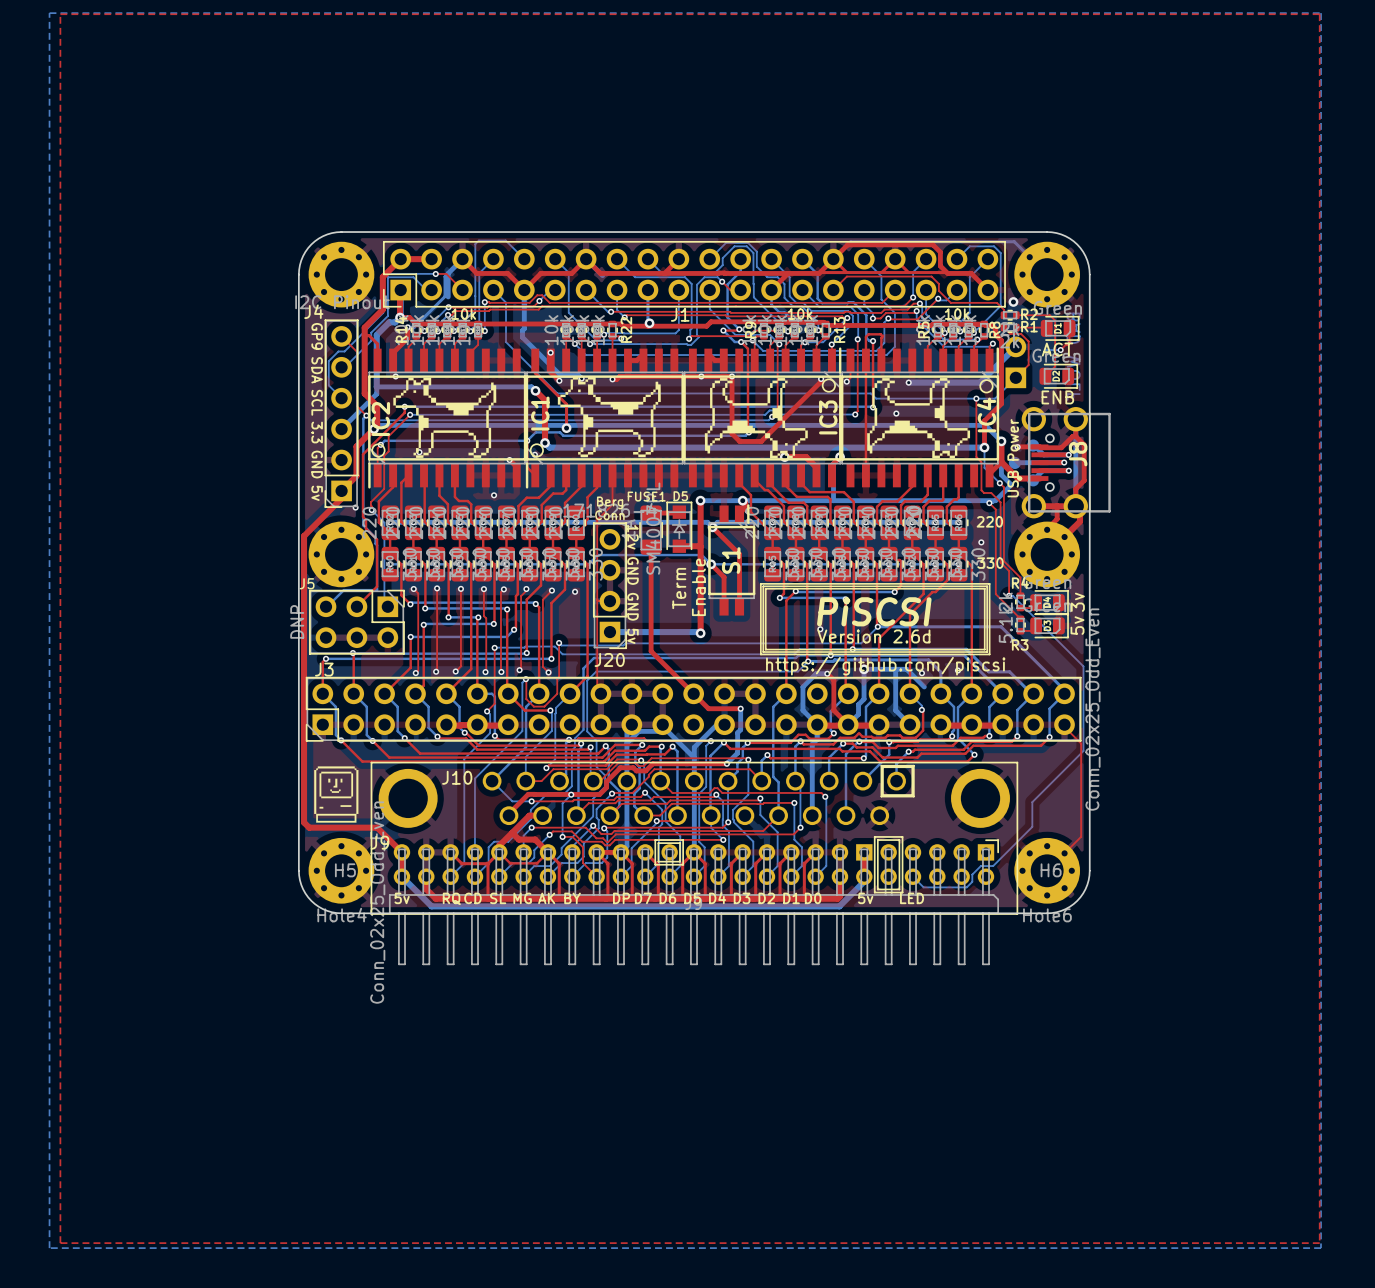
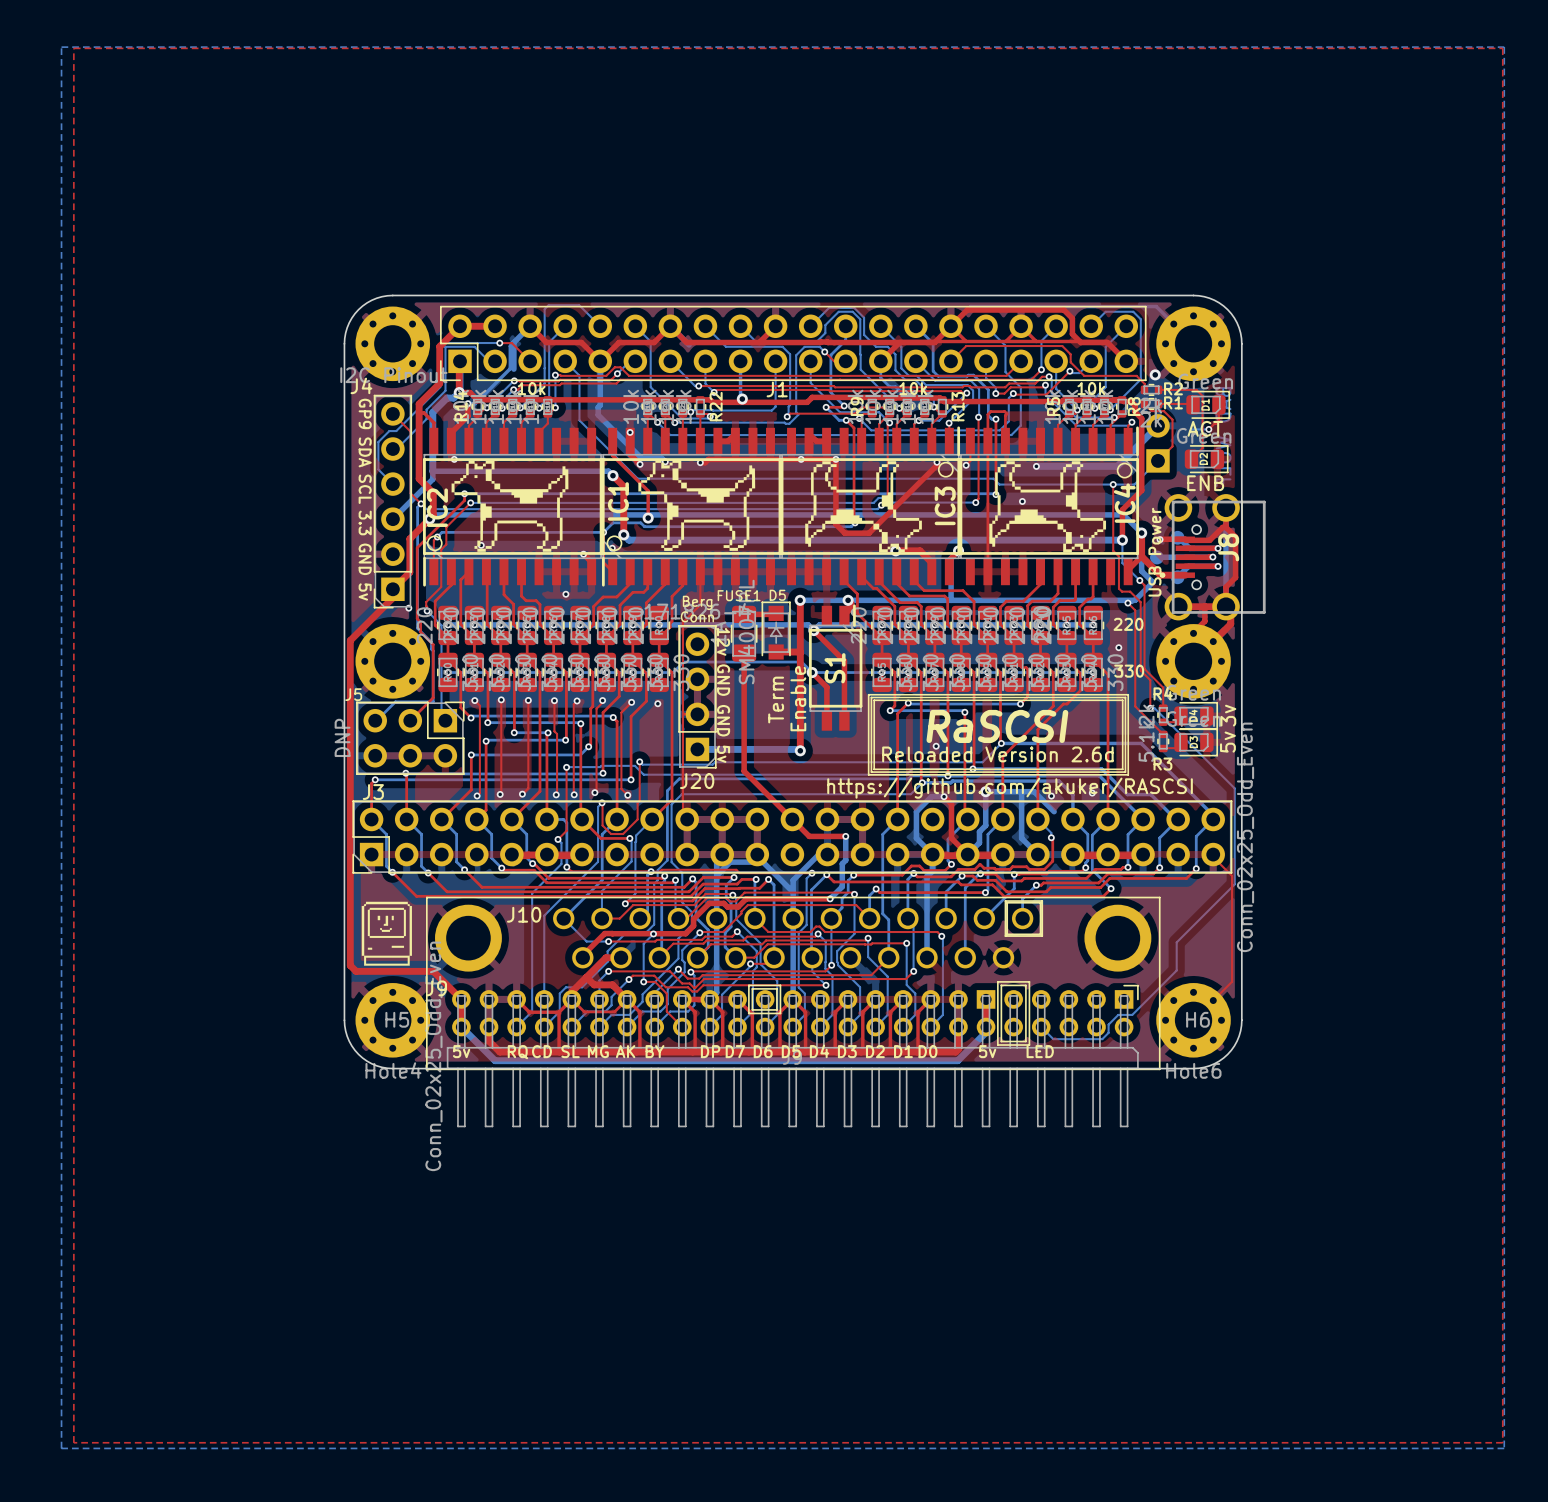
text: PiSCSI (874, 611) -> RaSCSI (997, 726)
text: Version 2.6d (873, 636) -> Reloaded Version 2.6d (997, 754)
text: https://github.com/piscsi (885, 666) -> https://github.com/akuker/RASCSI (1010, 788)

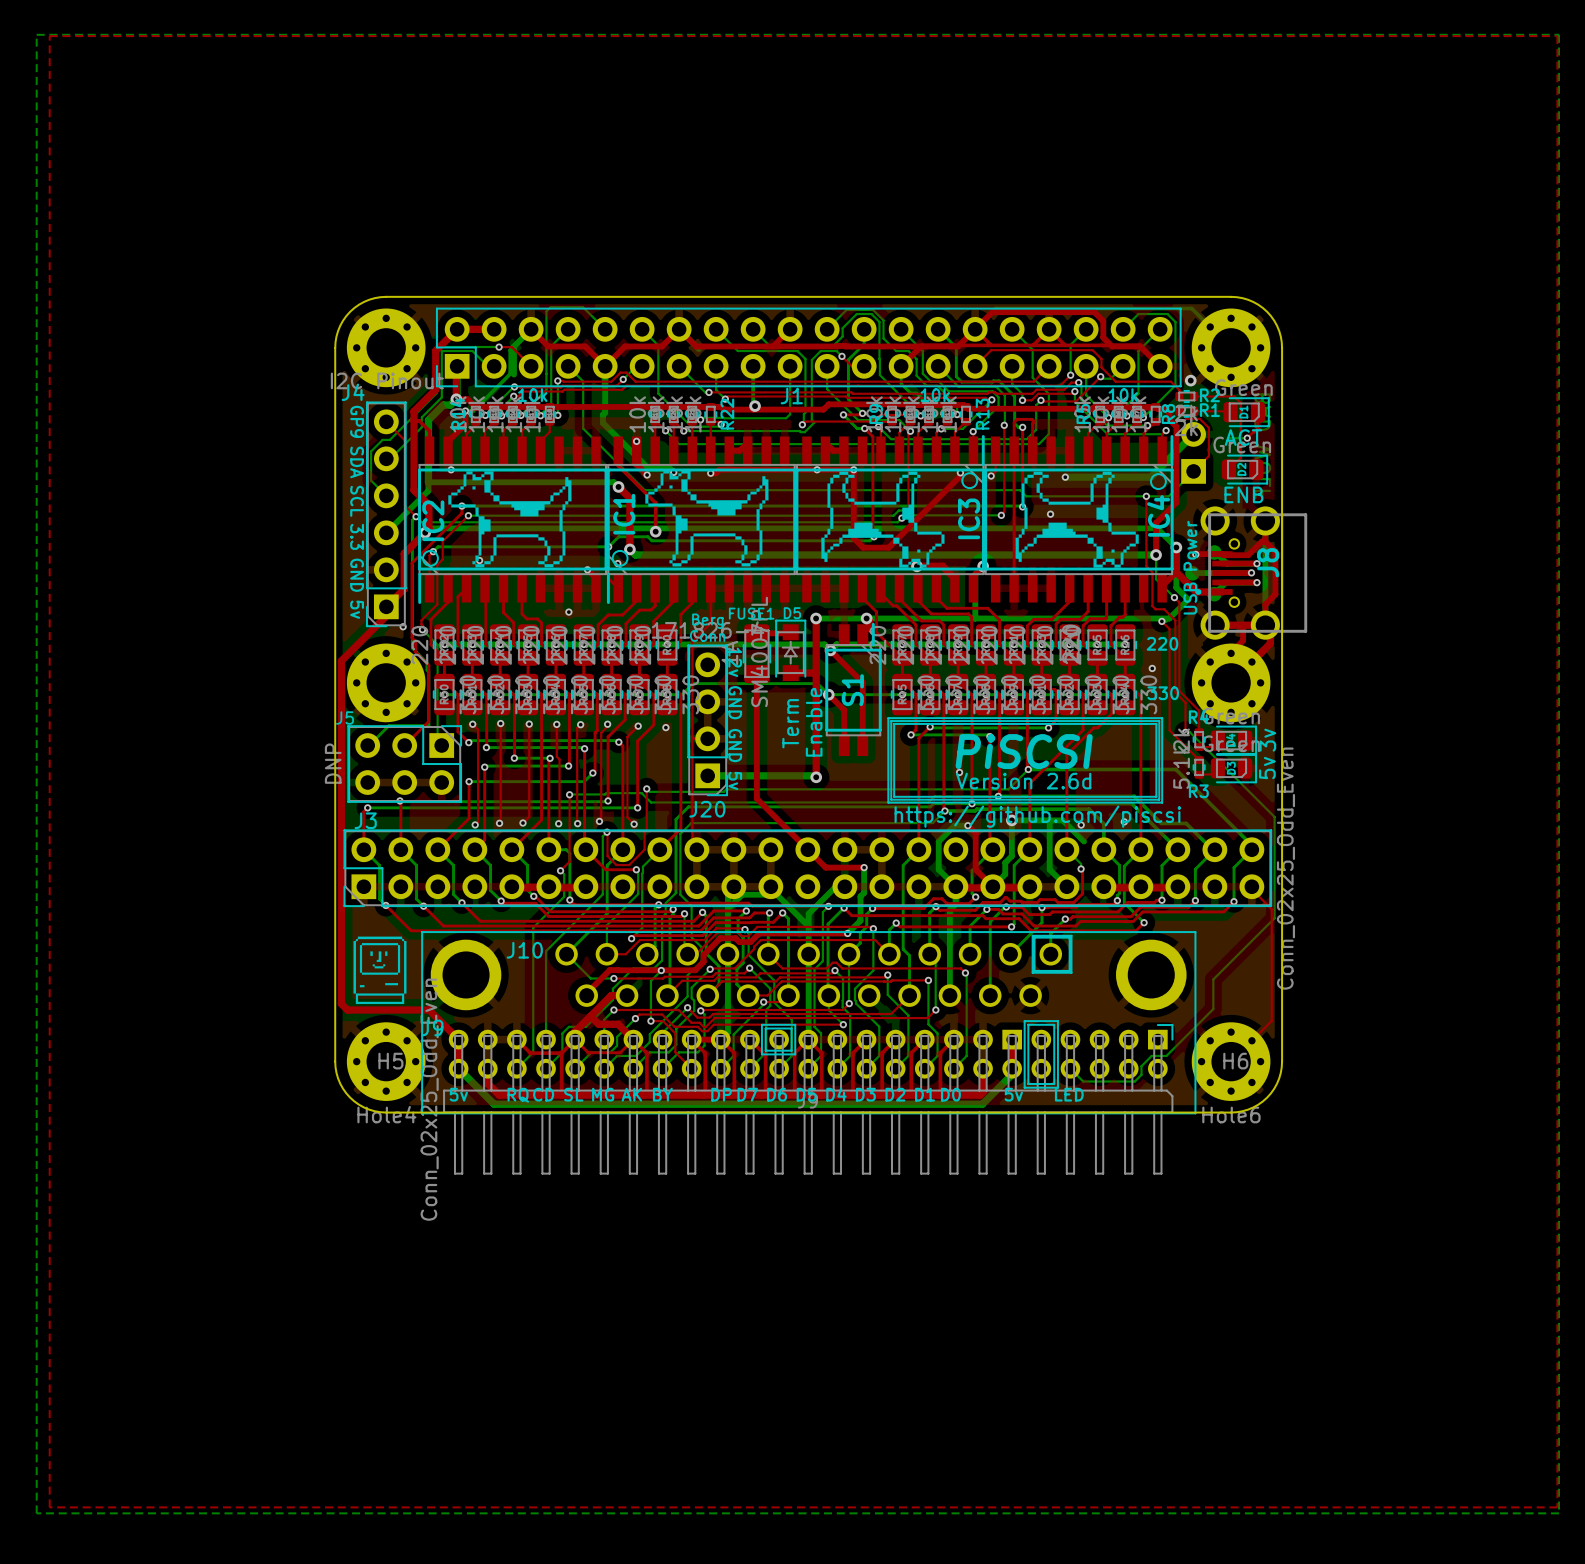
text: RaSCSI (997, 726) -> PiSCSI (1024, 751)
text: Reloaded Version 2.6d (997, 754) -> Version 2.6d (1023, 781)
text: https://github.com/akuker/RASCSI (1010, 788) -> https://github.com/piscsi (1037, 816)

